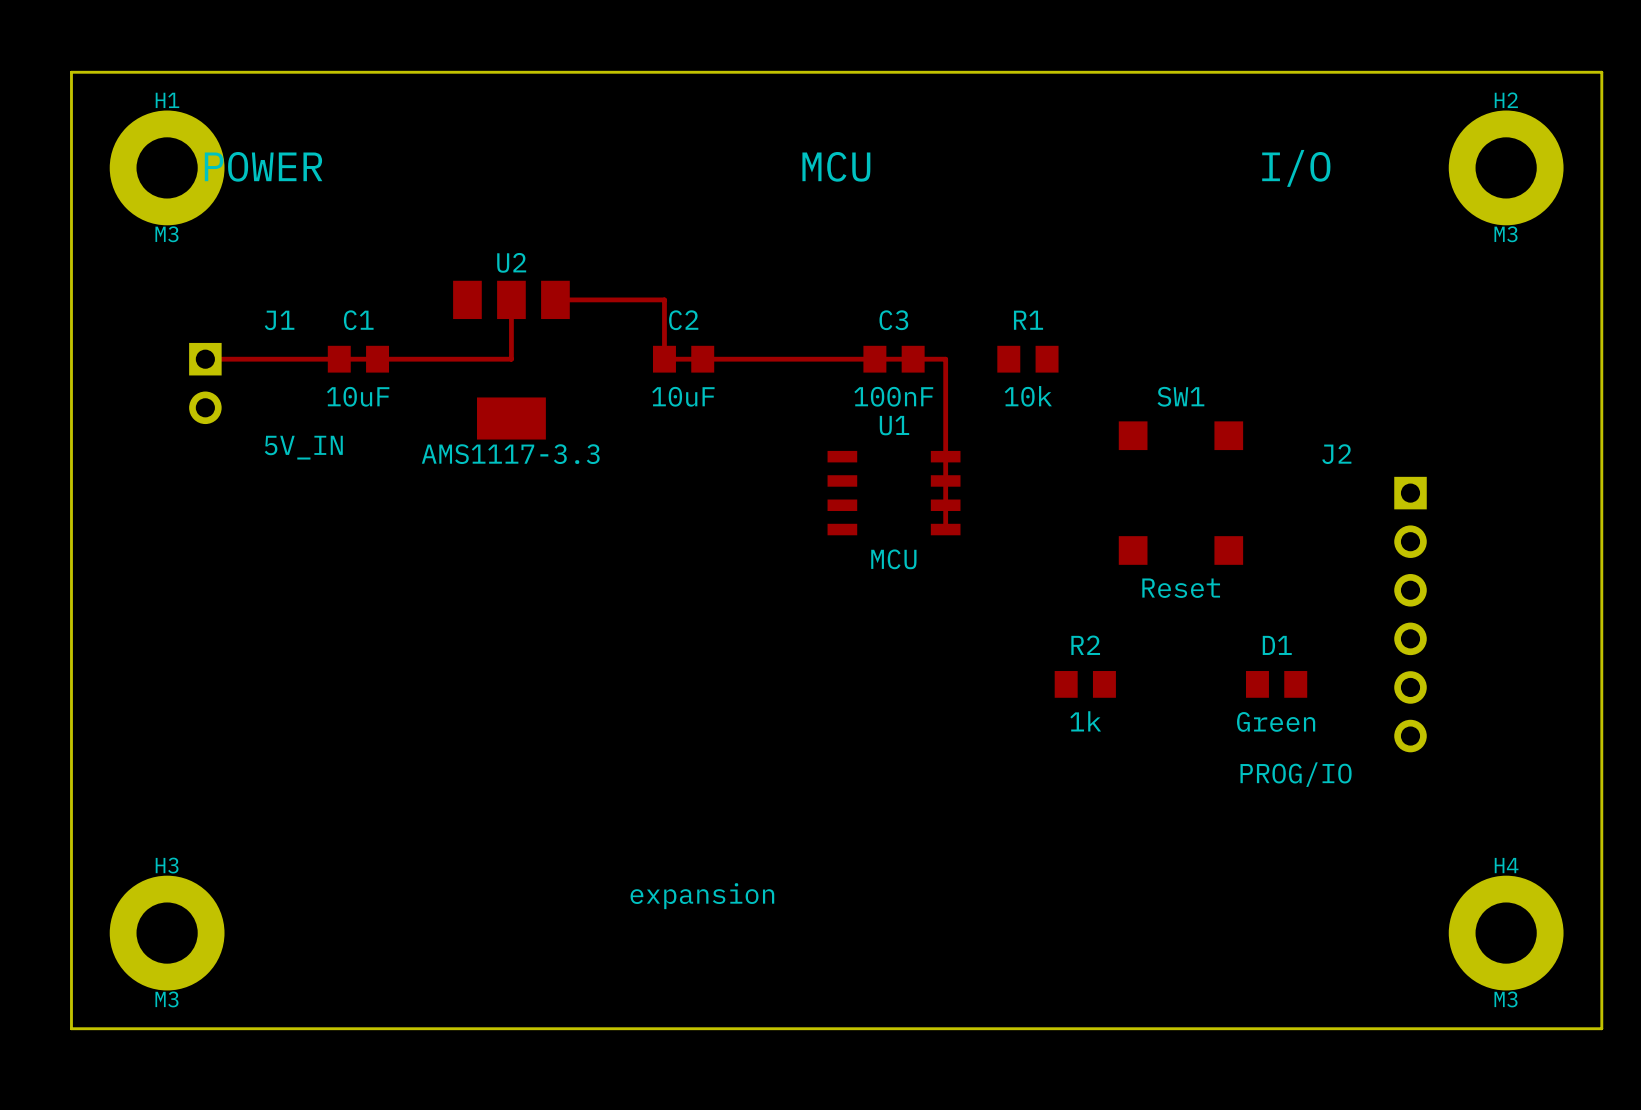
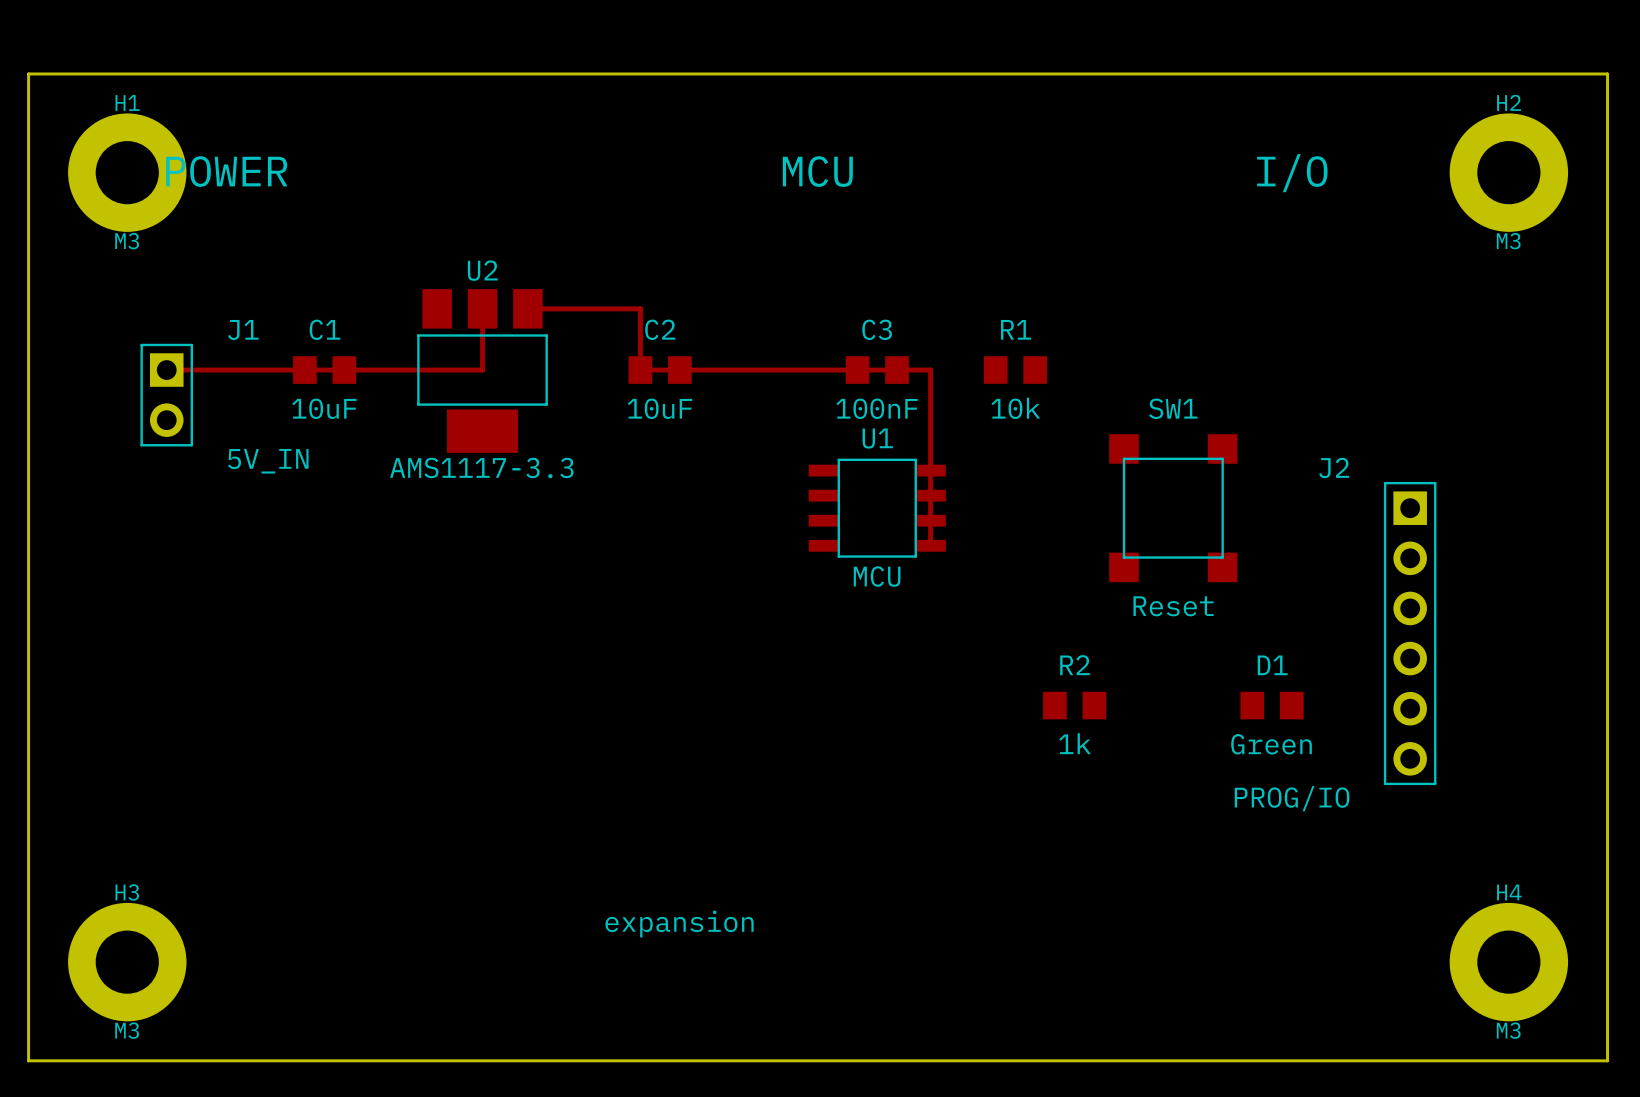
line: none -> (418, 335) (546, 335) (546, 404) (418, 404) (418, 335)
line: none -> (141, 344) (191, 344) (191, 445) (141, 445) (141, 344)
line: none -> (1123, 458) (1222, 458) (1222, 557) (1123, 557) (1123, 458)
line: none -> (838, 459) (915, 459) (915, 556) (838, 556) (838, 459)
line: none -> (1385, 483) (1435, 483) (1435, 783) (1385, 783) (1385, 483)

